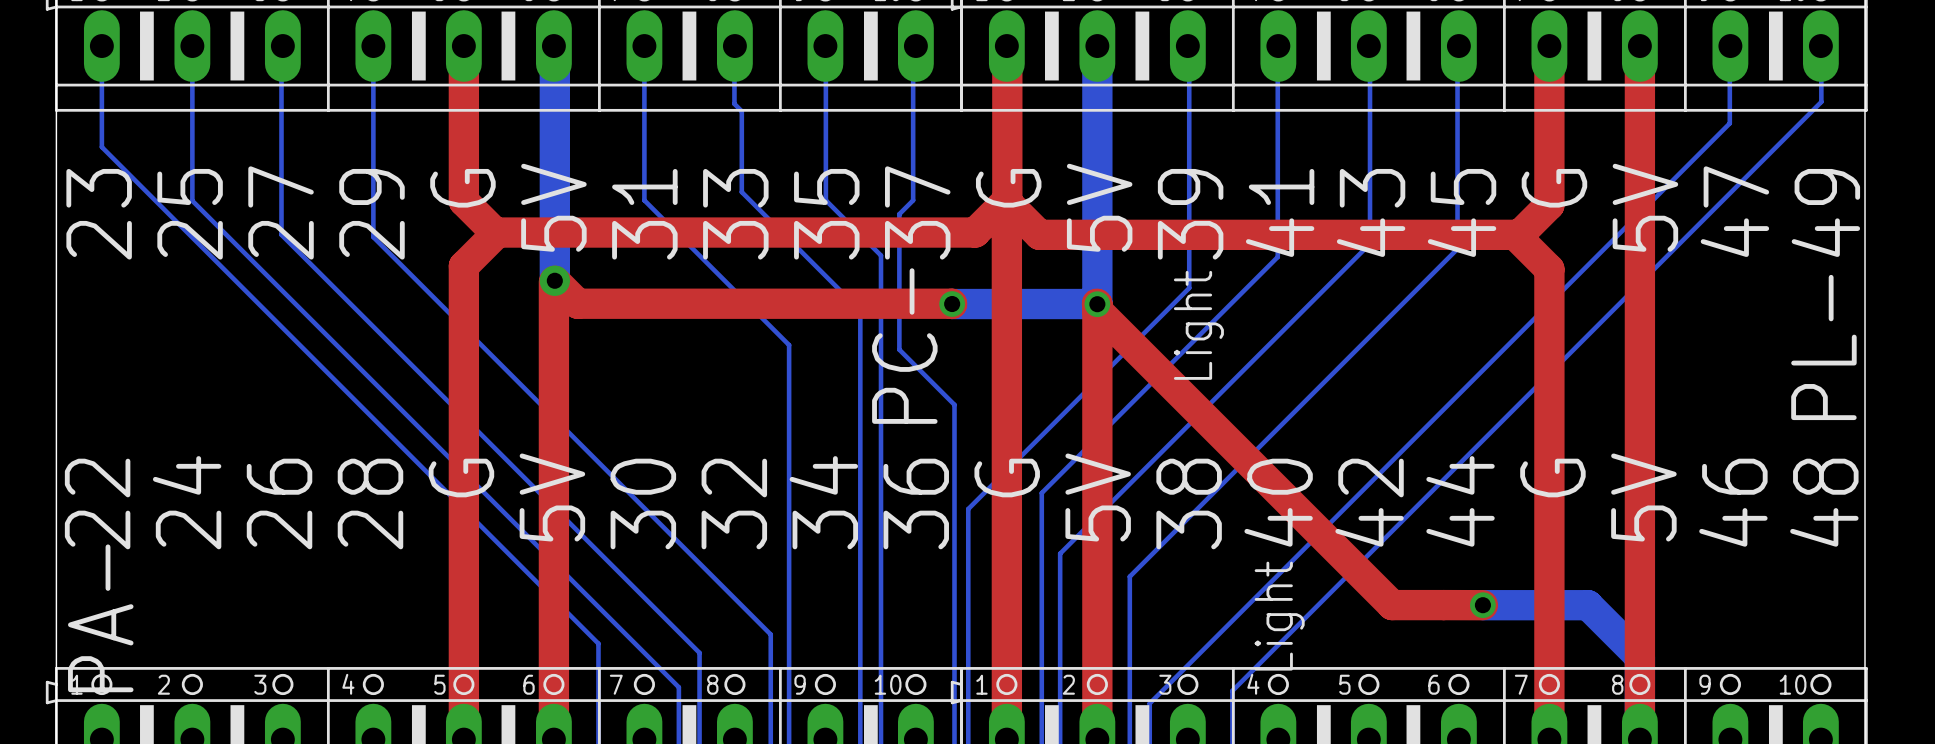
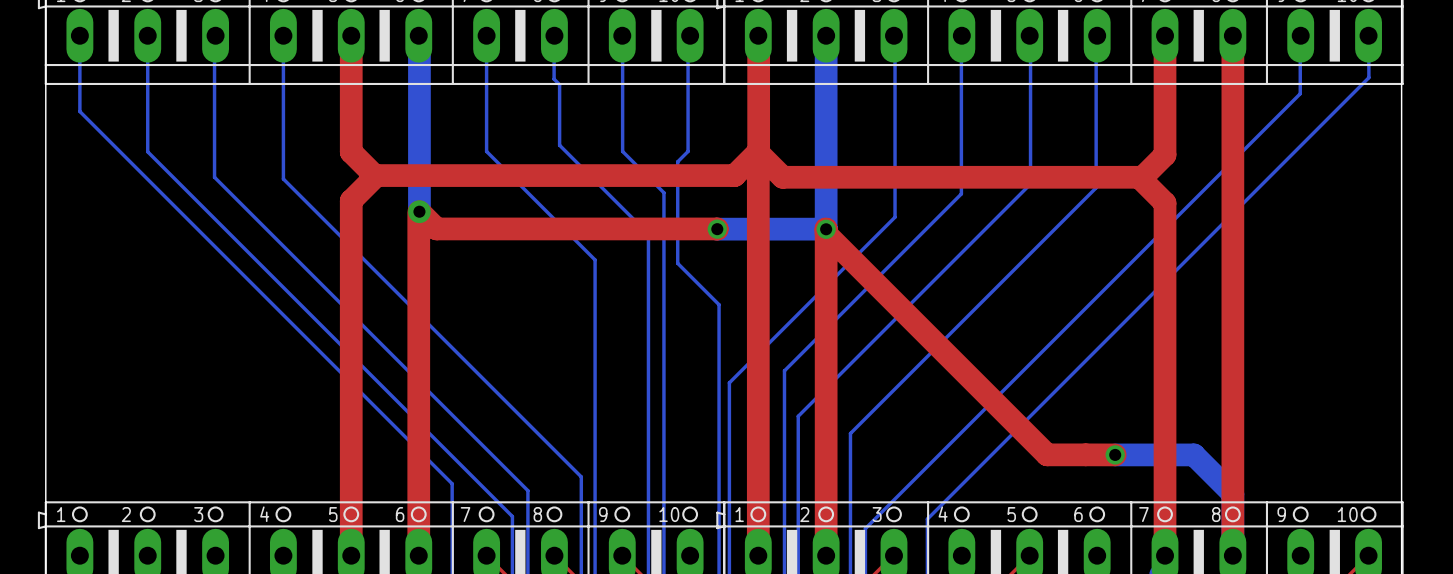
text: G (462, 188) -> none
text: G (1008, 188) -> none
text: G (1554, 188) -> none
text: 5V (553, 207) -> none
text: 5V (1099, 207) -> none
text: 5V (1645, 207) -> none
text: 47 (1734, 211) -> none
text: 27 (281, 212) -> none
text: 37 (917, 212) -> none
text: 41 (1280, 212) -> none
text: 43 (1371, 212) -> none
text: 45 (1462, 212) -> none
text: 49 (1825, 212) -> none
text: 23 (99, 214) -> none
text: 25 (190, 214) -> none
text: 29 (372, 214) -> none
text: 31 (644, 214) -> none
text: 33 (735, 214) -> none
text: 35 (826, 214) -> none
text: 39 (1190, 214) -> none
text: Light (1198, 325) -> none
text: PC- (904, 346) -> none
text: PL- (1823, 347) -> none
text: G (461, 478) -> none
text: G (1007, 478) -> none
text: G (1552, 478) -> none
text: 5V (552, 497) -> none
text: 5V (1098, 497) -> none
text: 5V (1643, 497) -> none
text: 44 (1460, 501) -> none
text: 24 (187, 502) -> none
text: 34 (823, 502) -> none
text: 40 (1278, 502) -> none
text: 42 (1369, 502) -> none
text: 46 (1733, 502) -> none
text: 48 (1824, 502) -> none
text: 22 (97, 504) -> none
text: 26 (279, 504) -> none
text: 28 (370, 504) -> none
text: 30 (643, 504) -> none
text: 32 (734, 504) -> none
text: 36 (916, 504) -> none
text: 38 (1189, 504) -> none
text: Light (1279, 616) -> none
text: PA- (100, 618) -> none

